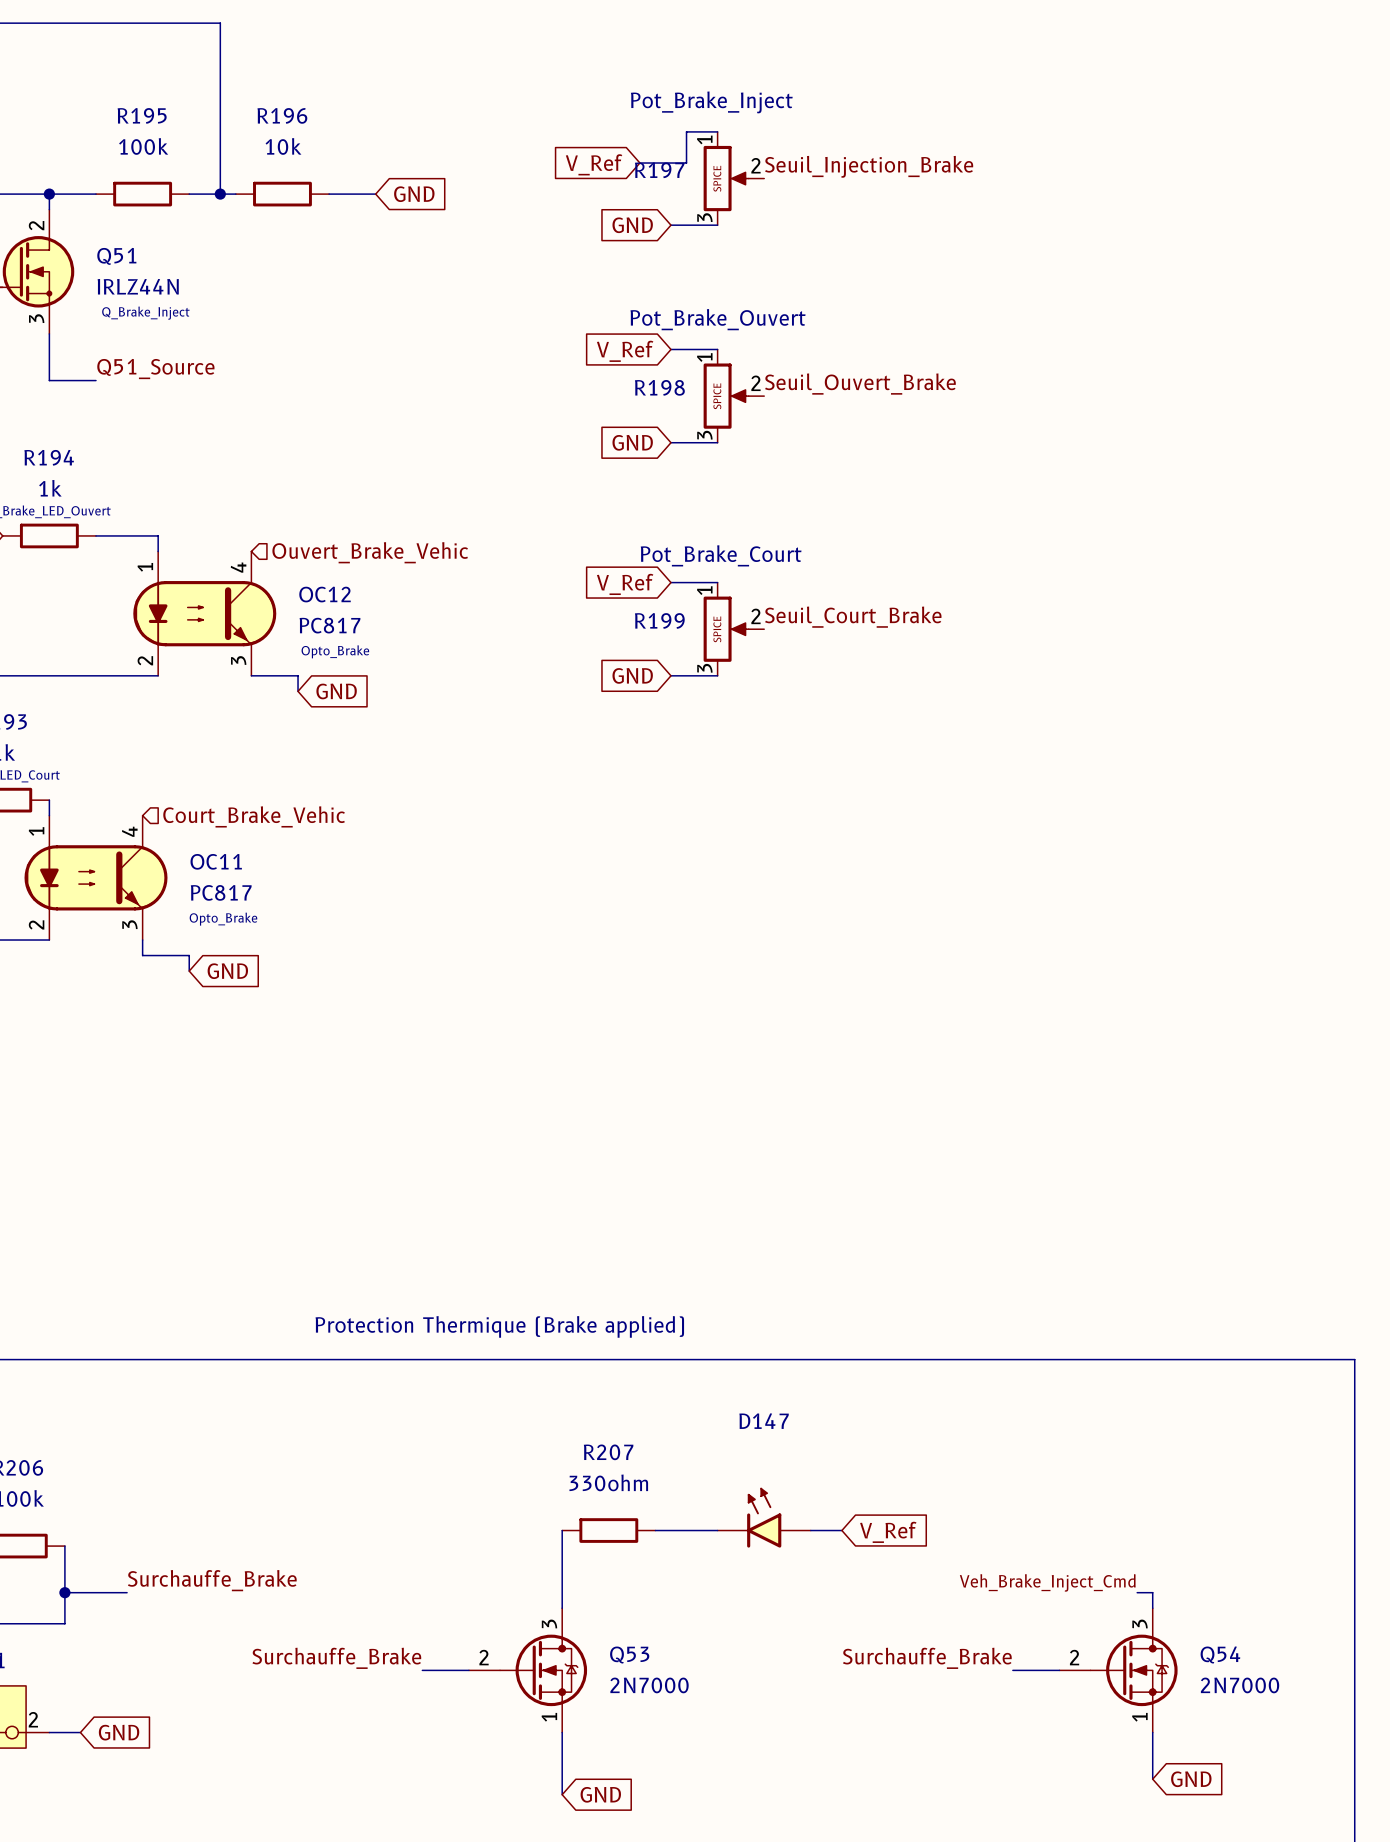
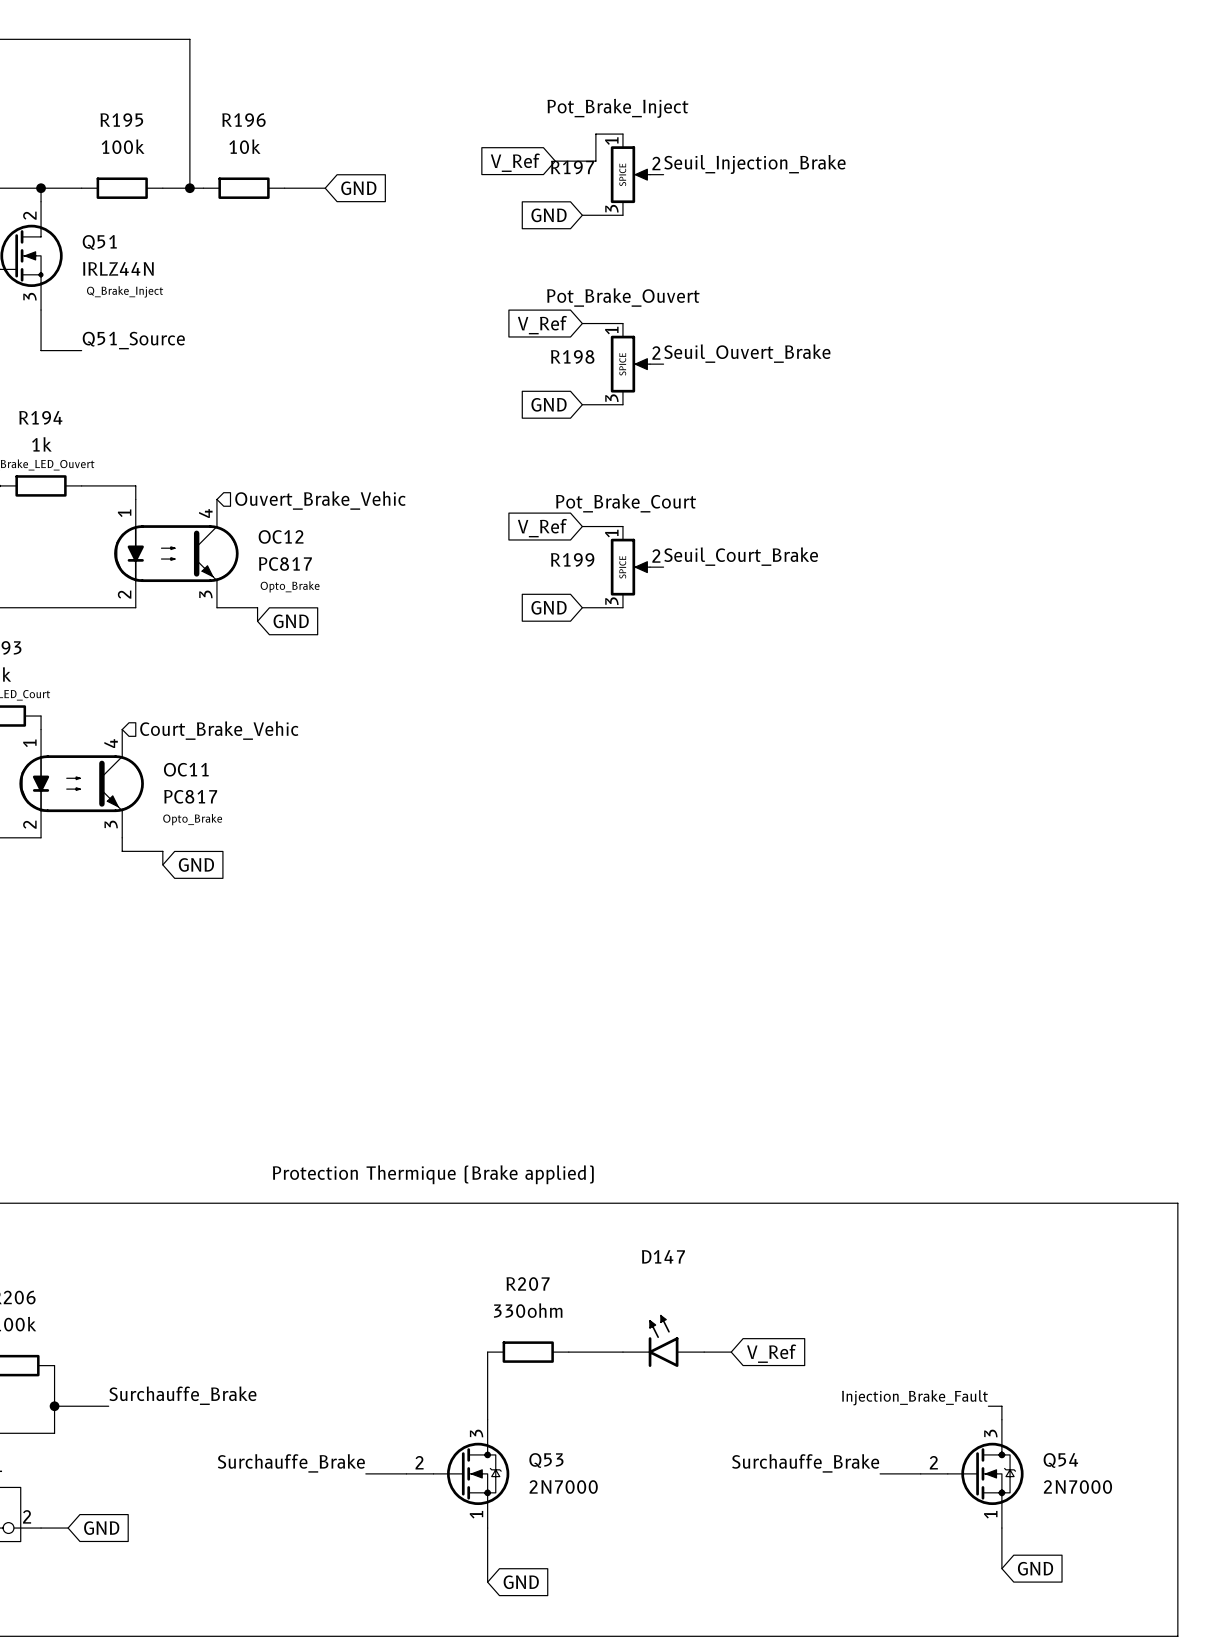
label: Veh_Brake_Inject_Cmd (1047, 1582) -> Injection_Brake_Fault (914, 1397)

